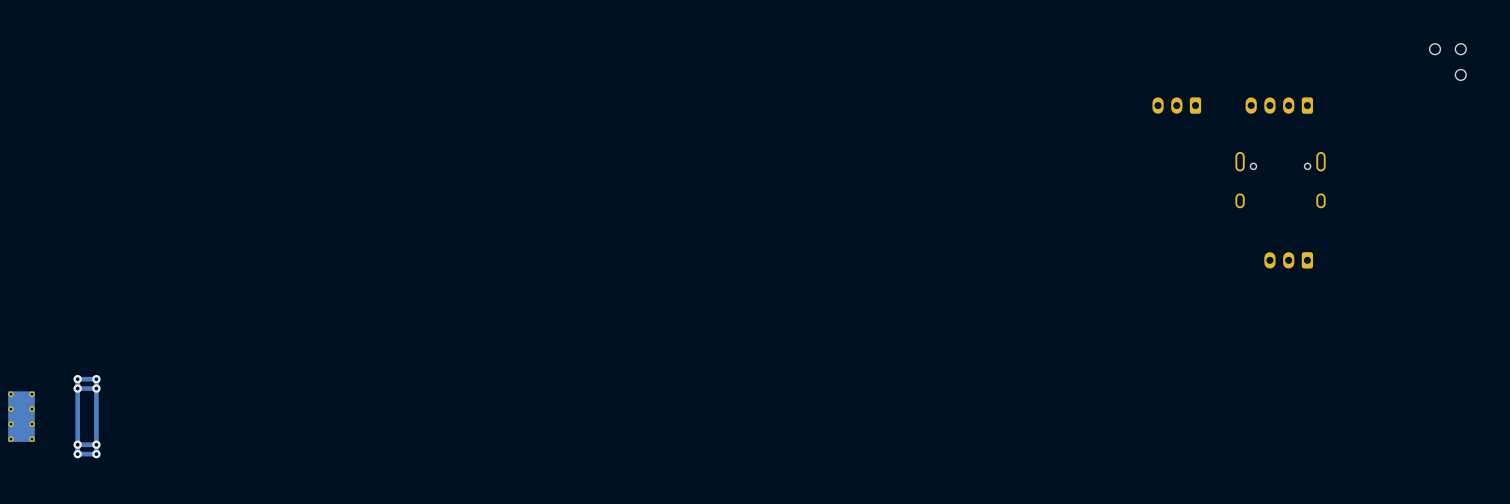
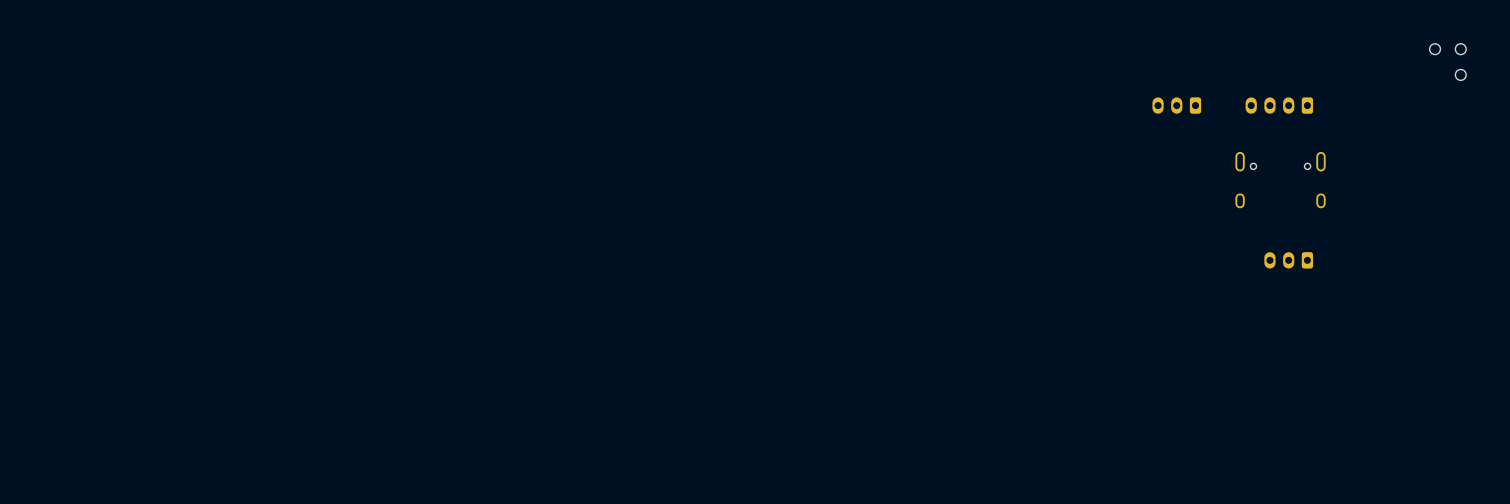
via: (77, 379) -> none
track: (96, 379) (96, 454) (77, 454) (77, 379) (96, 379) -> none
via: (96, 379) -> none
via: (77, 388) -> none
track: (96, 388) (77, 388) -> none
via: (96, 388) -> none
part: (21, 416) -> none
via: (77, 444) -> none
track: (96, 444) (77, 444) -> none
via: (96, 444) -> none
via: (77, 454) -> none
via: (96, 454) -> none

